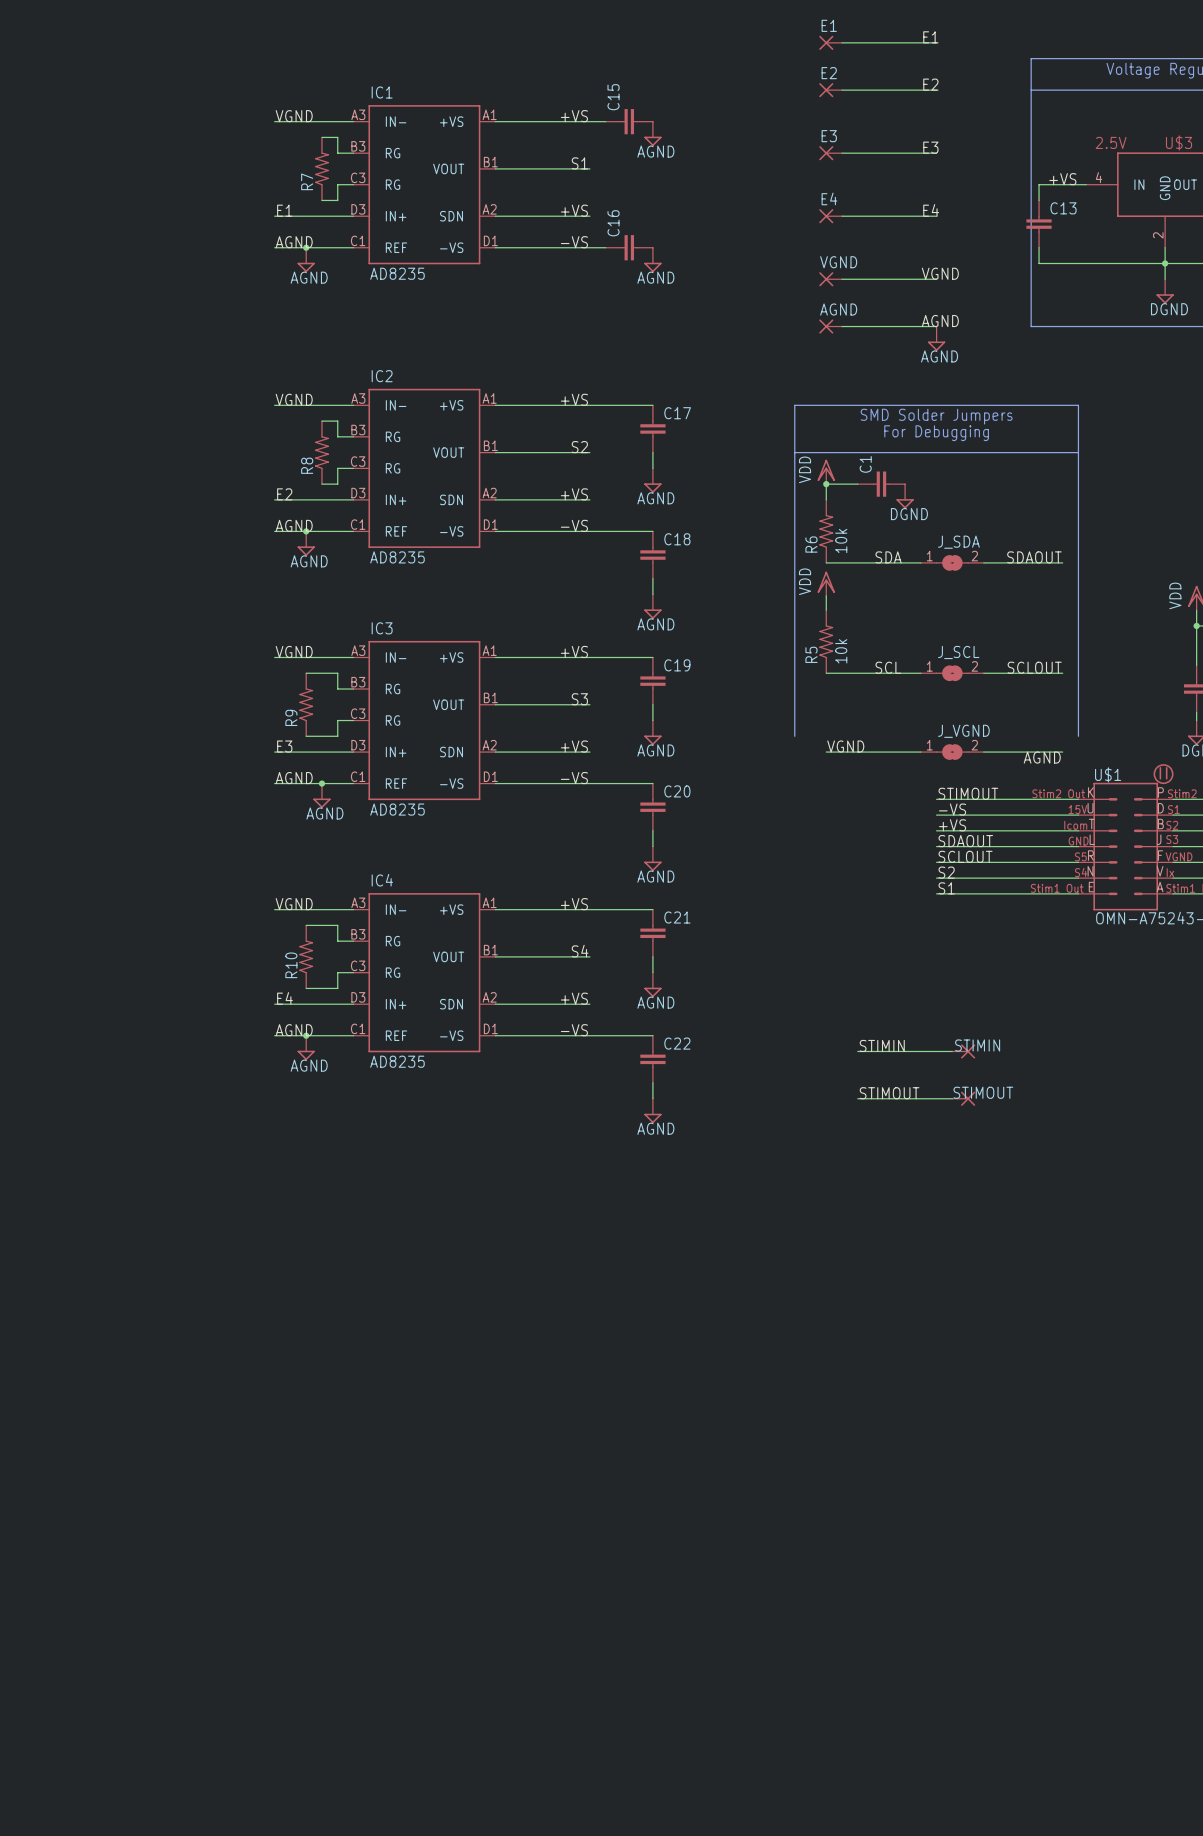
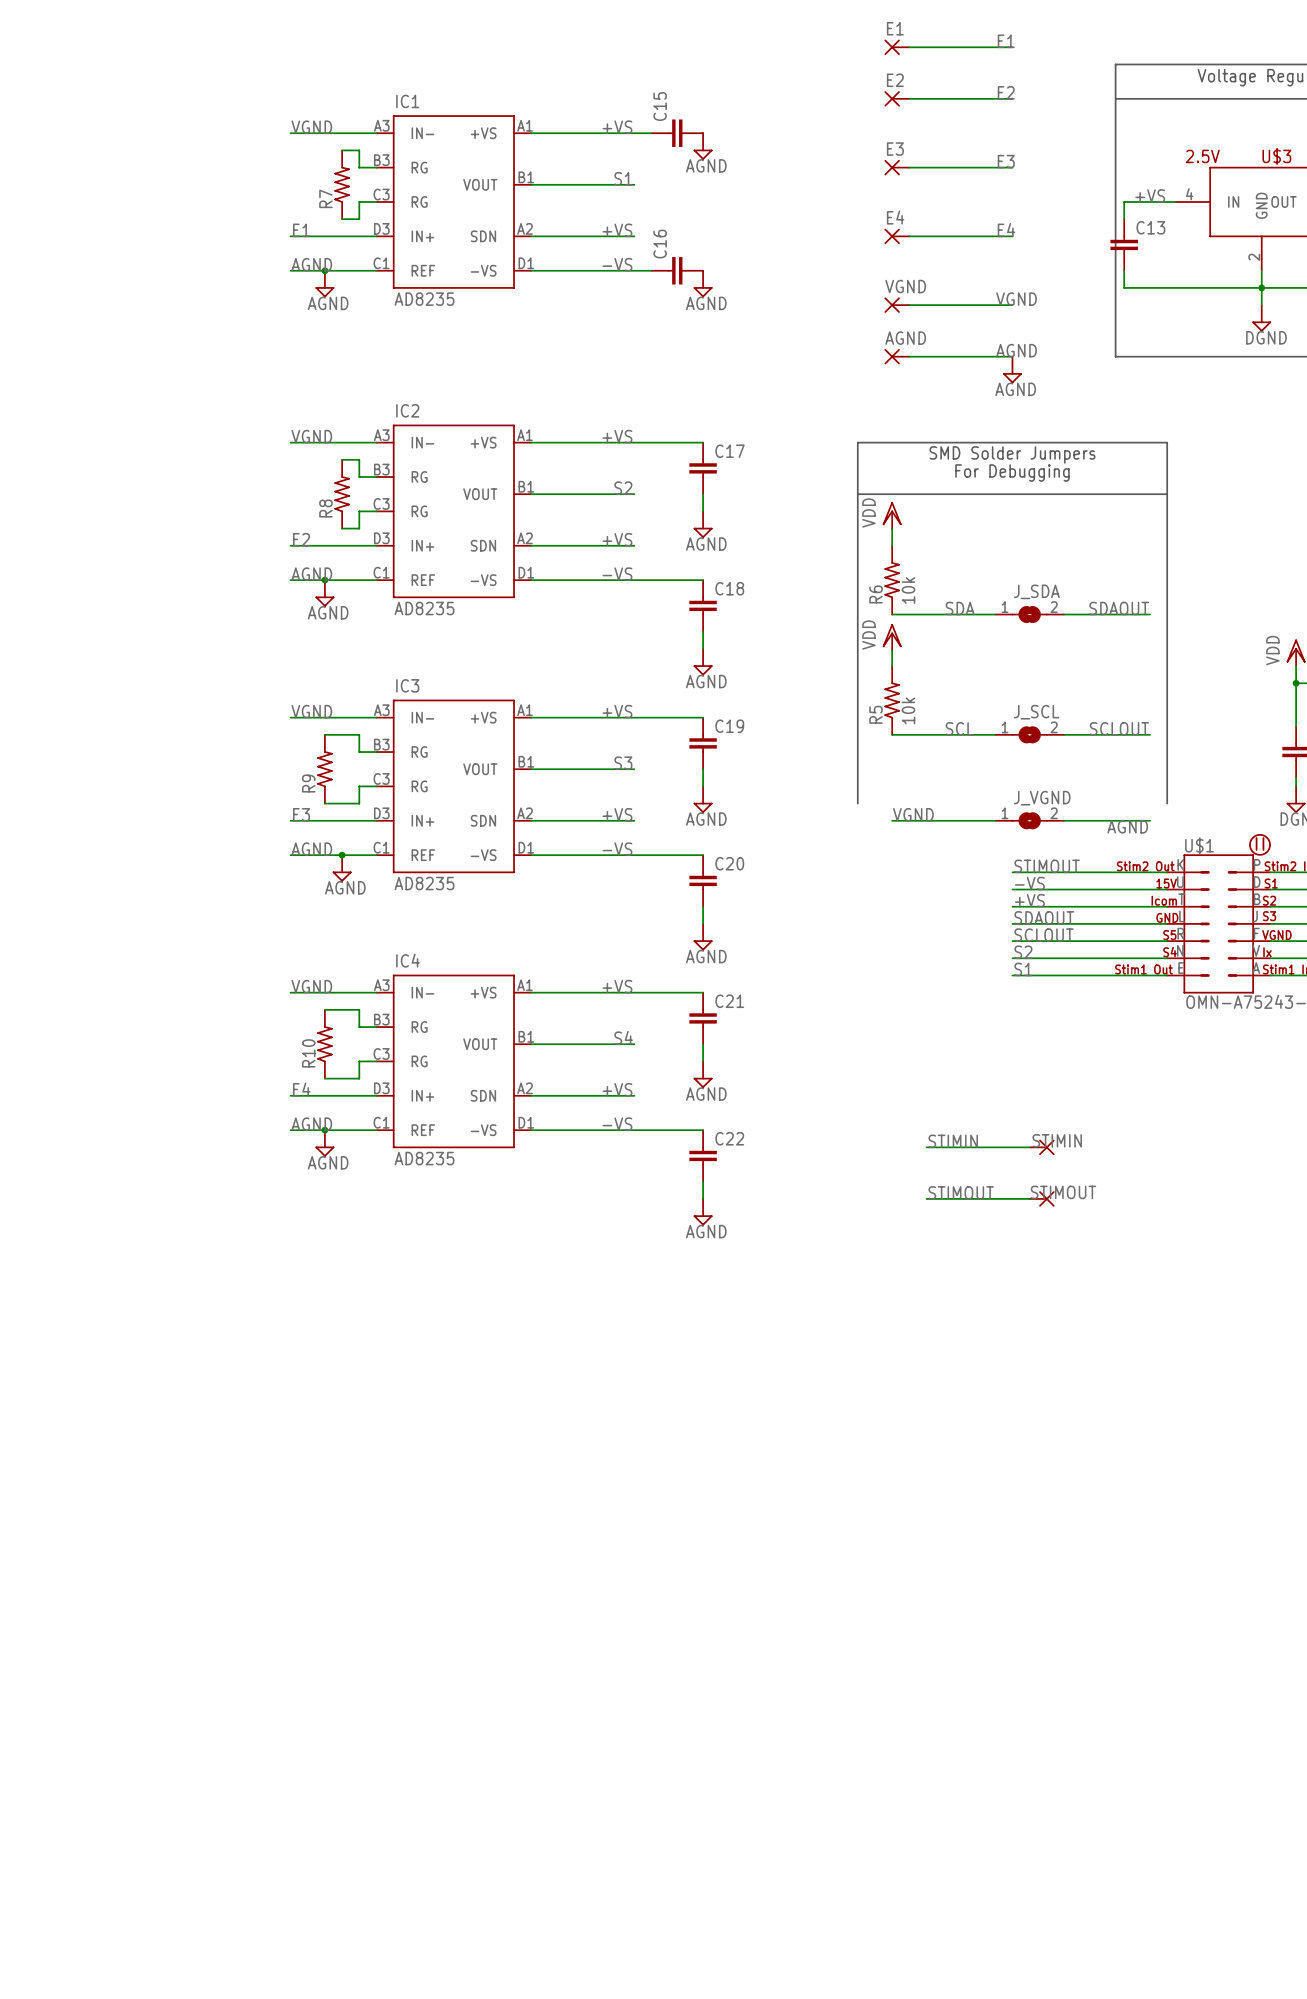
wire: (826, 484) (857, 484) -> none
junction: (826, 484) -> none
C1: (881, 484) -> none
power symbol: DGND (905, 496) -> none

